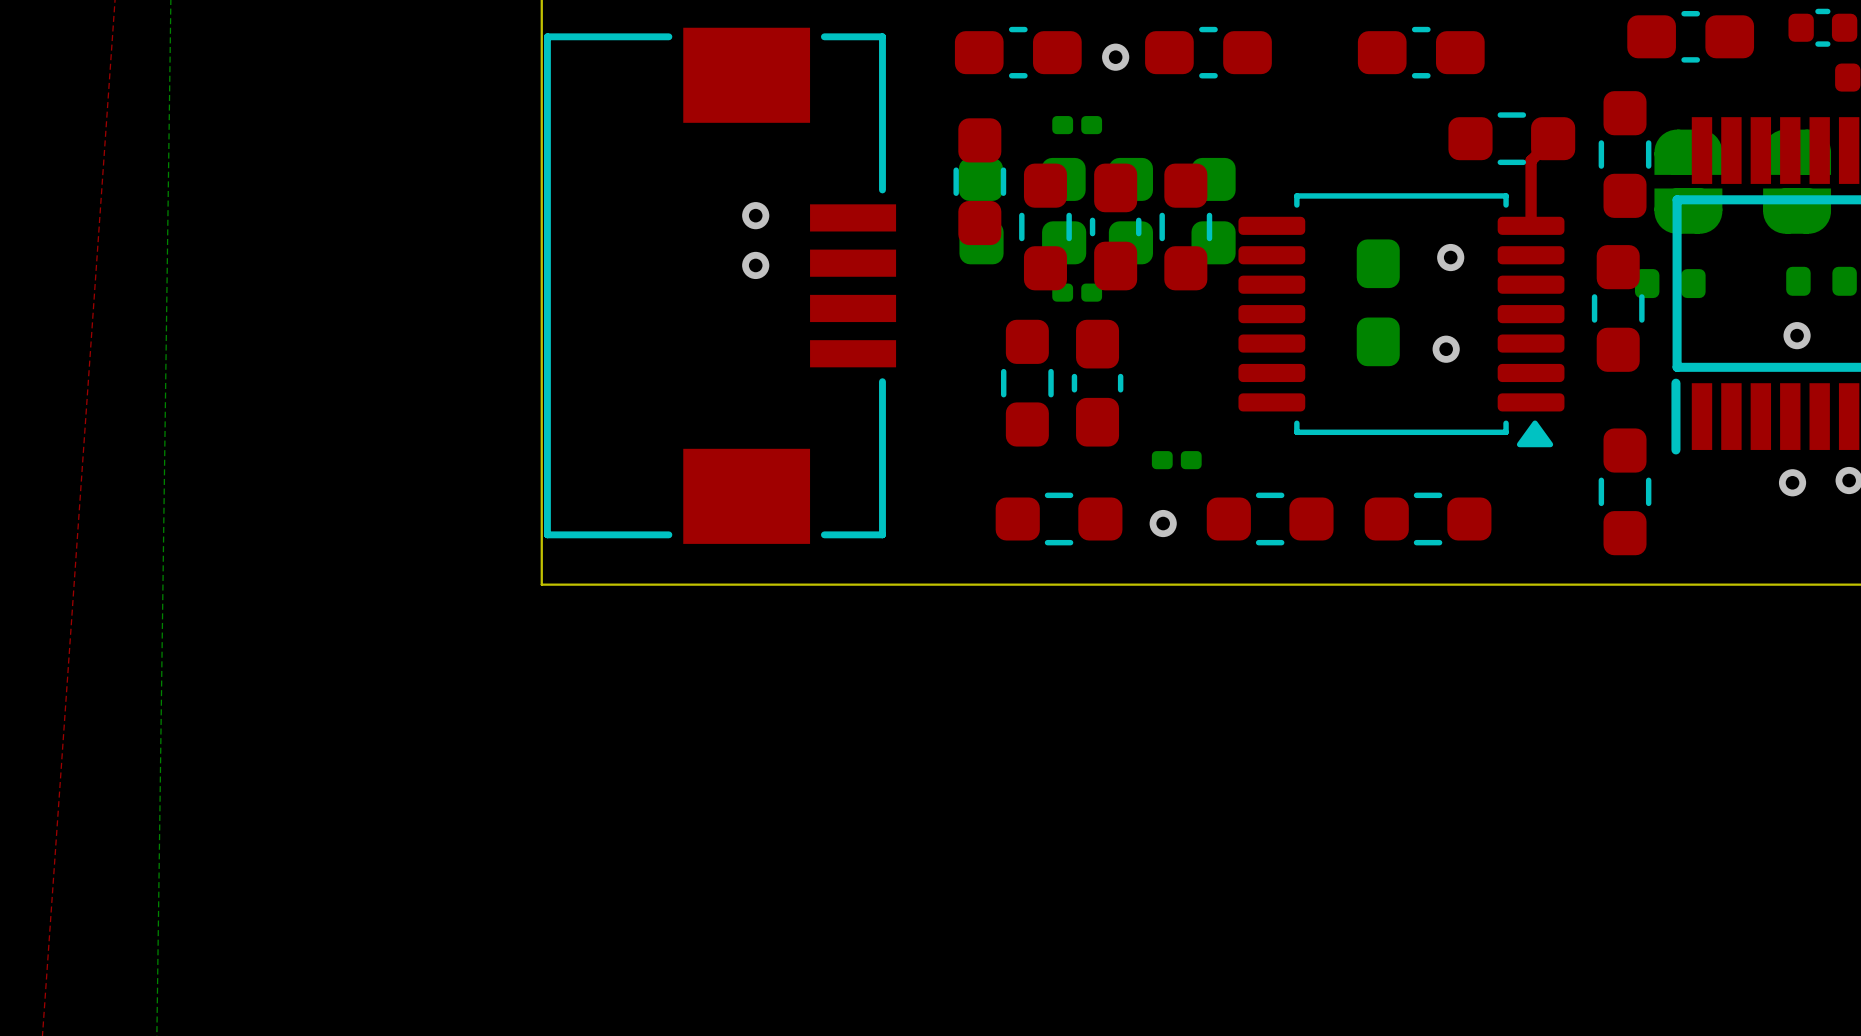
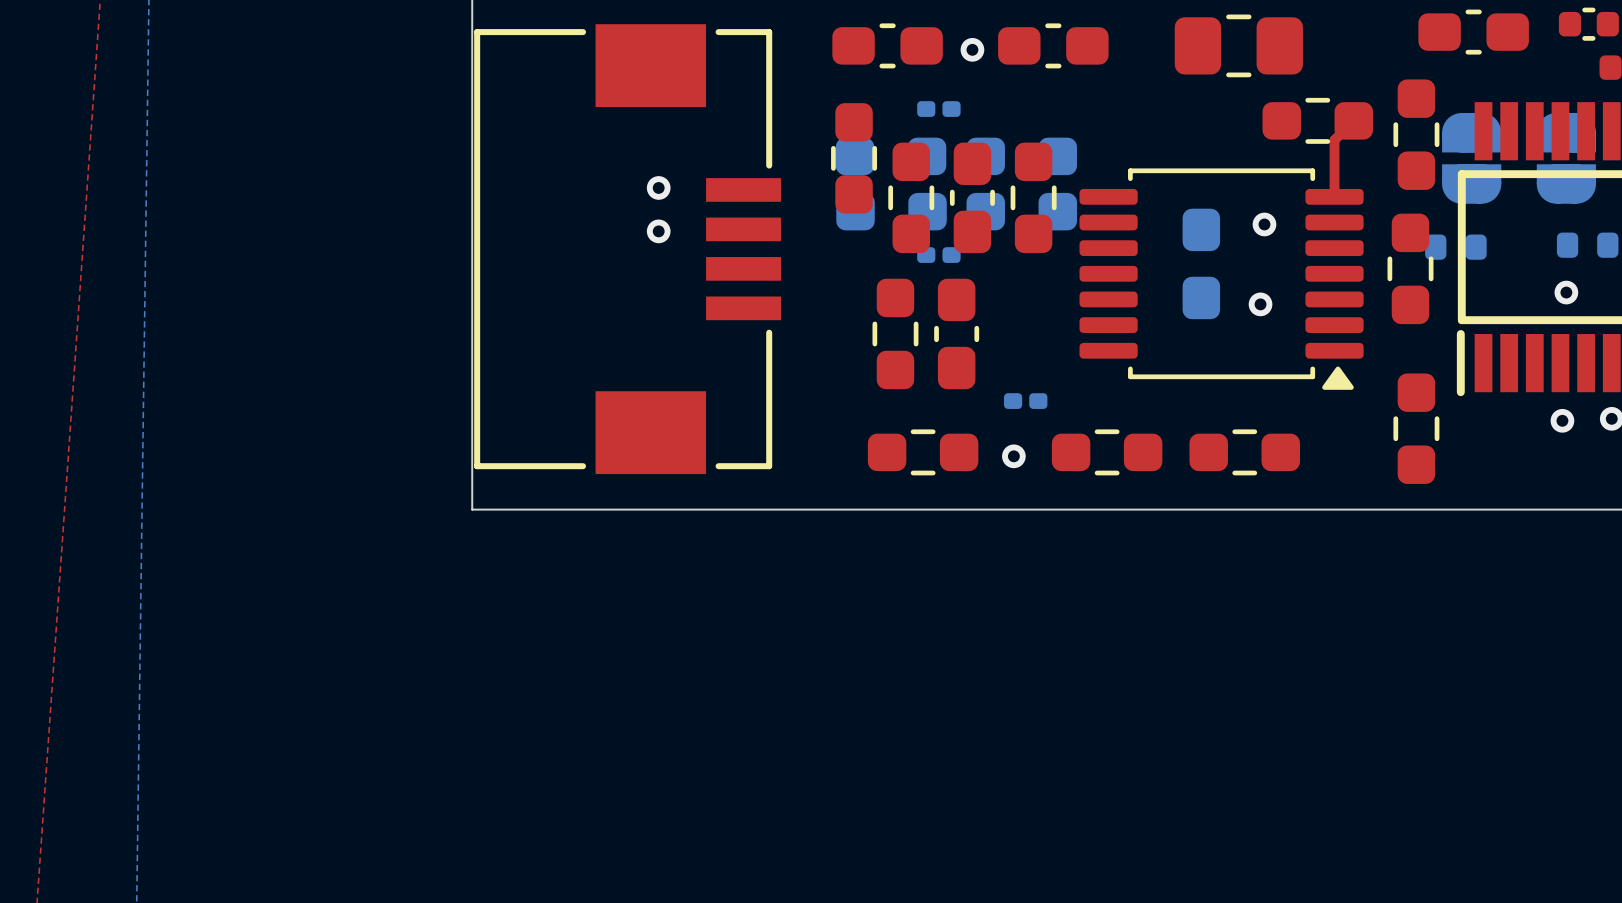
part footprint: [1357, 26, 1485, 79] -> [1174, 14, 1303, 78]

